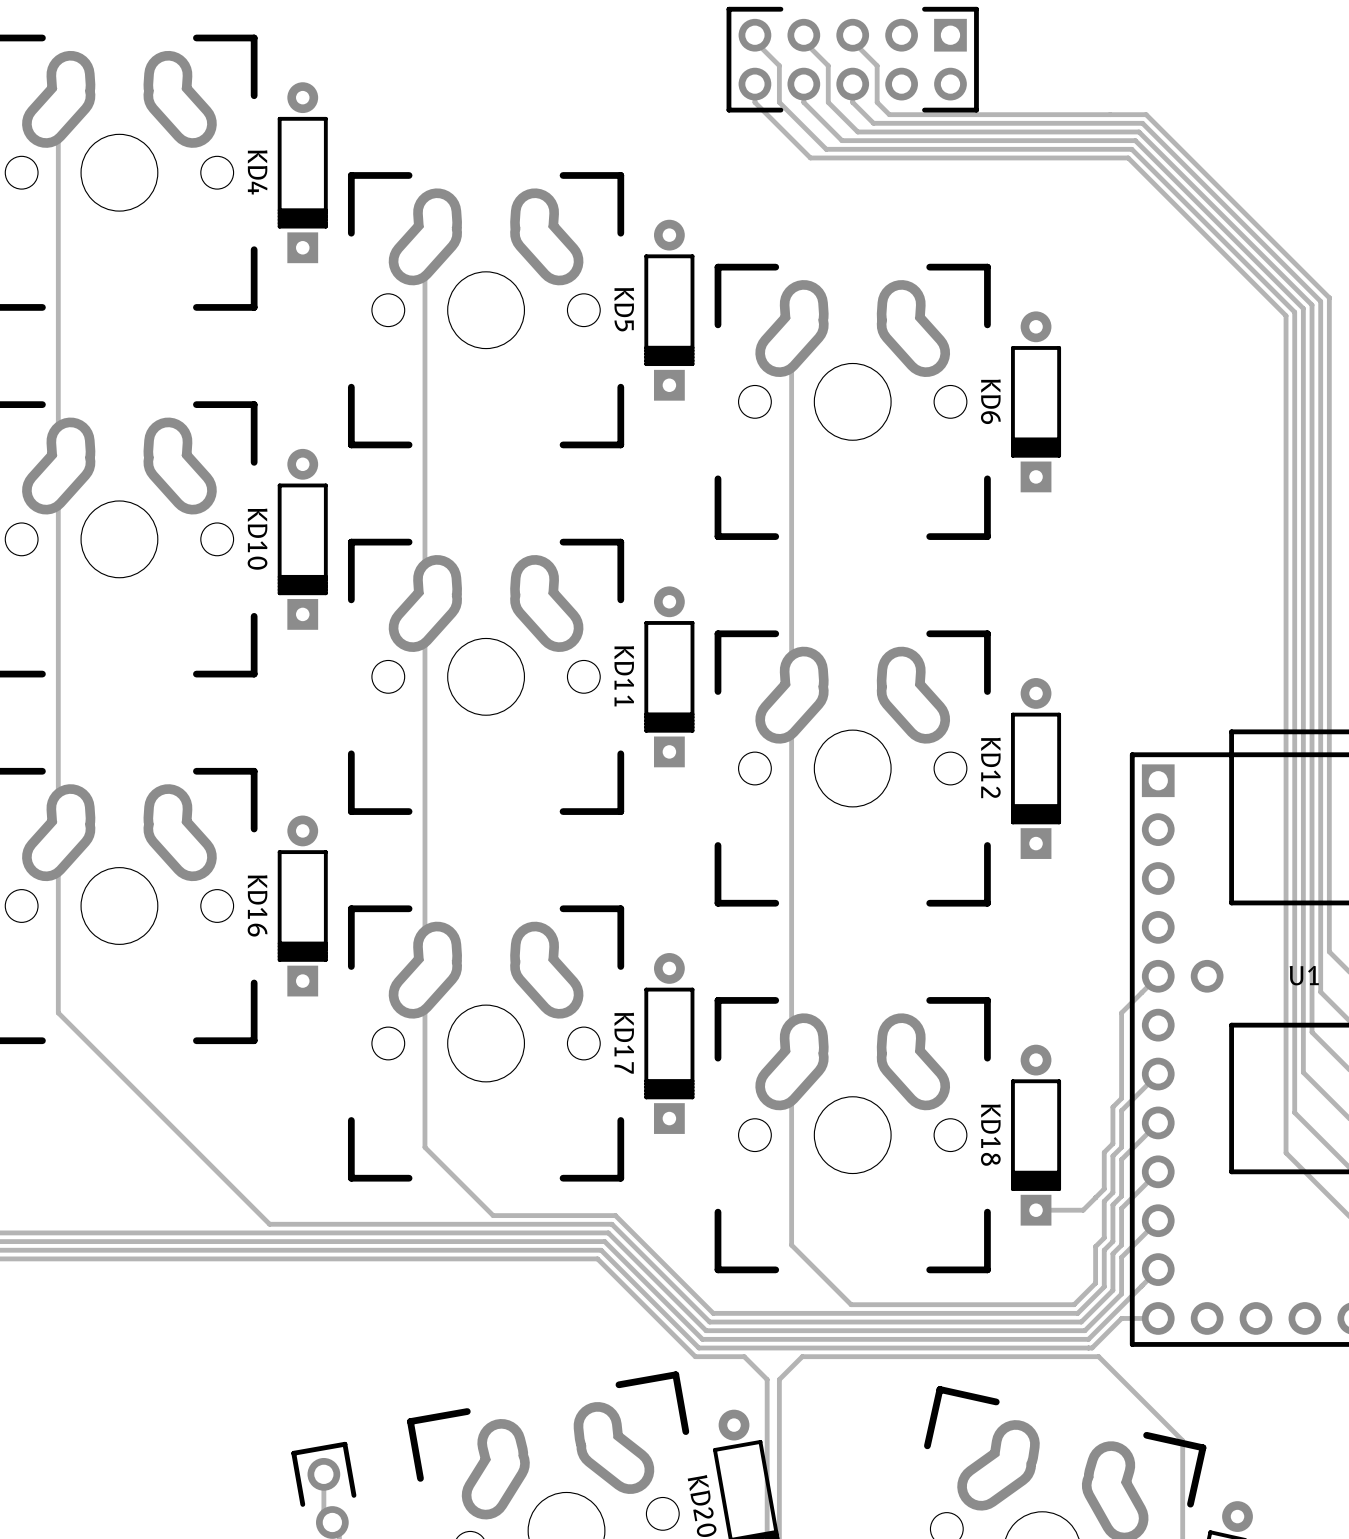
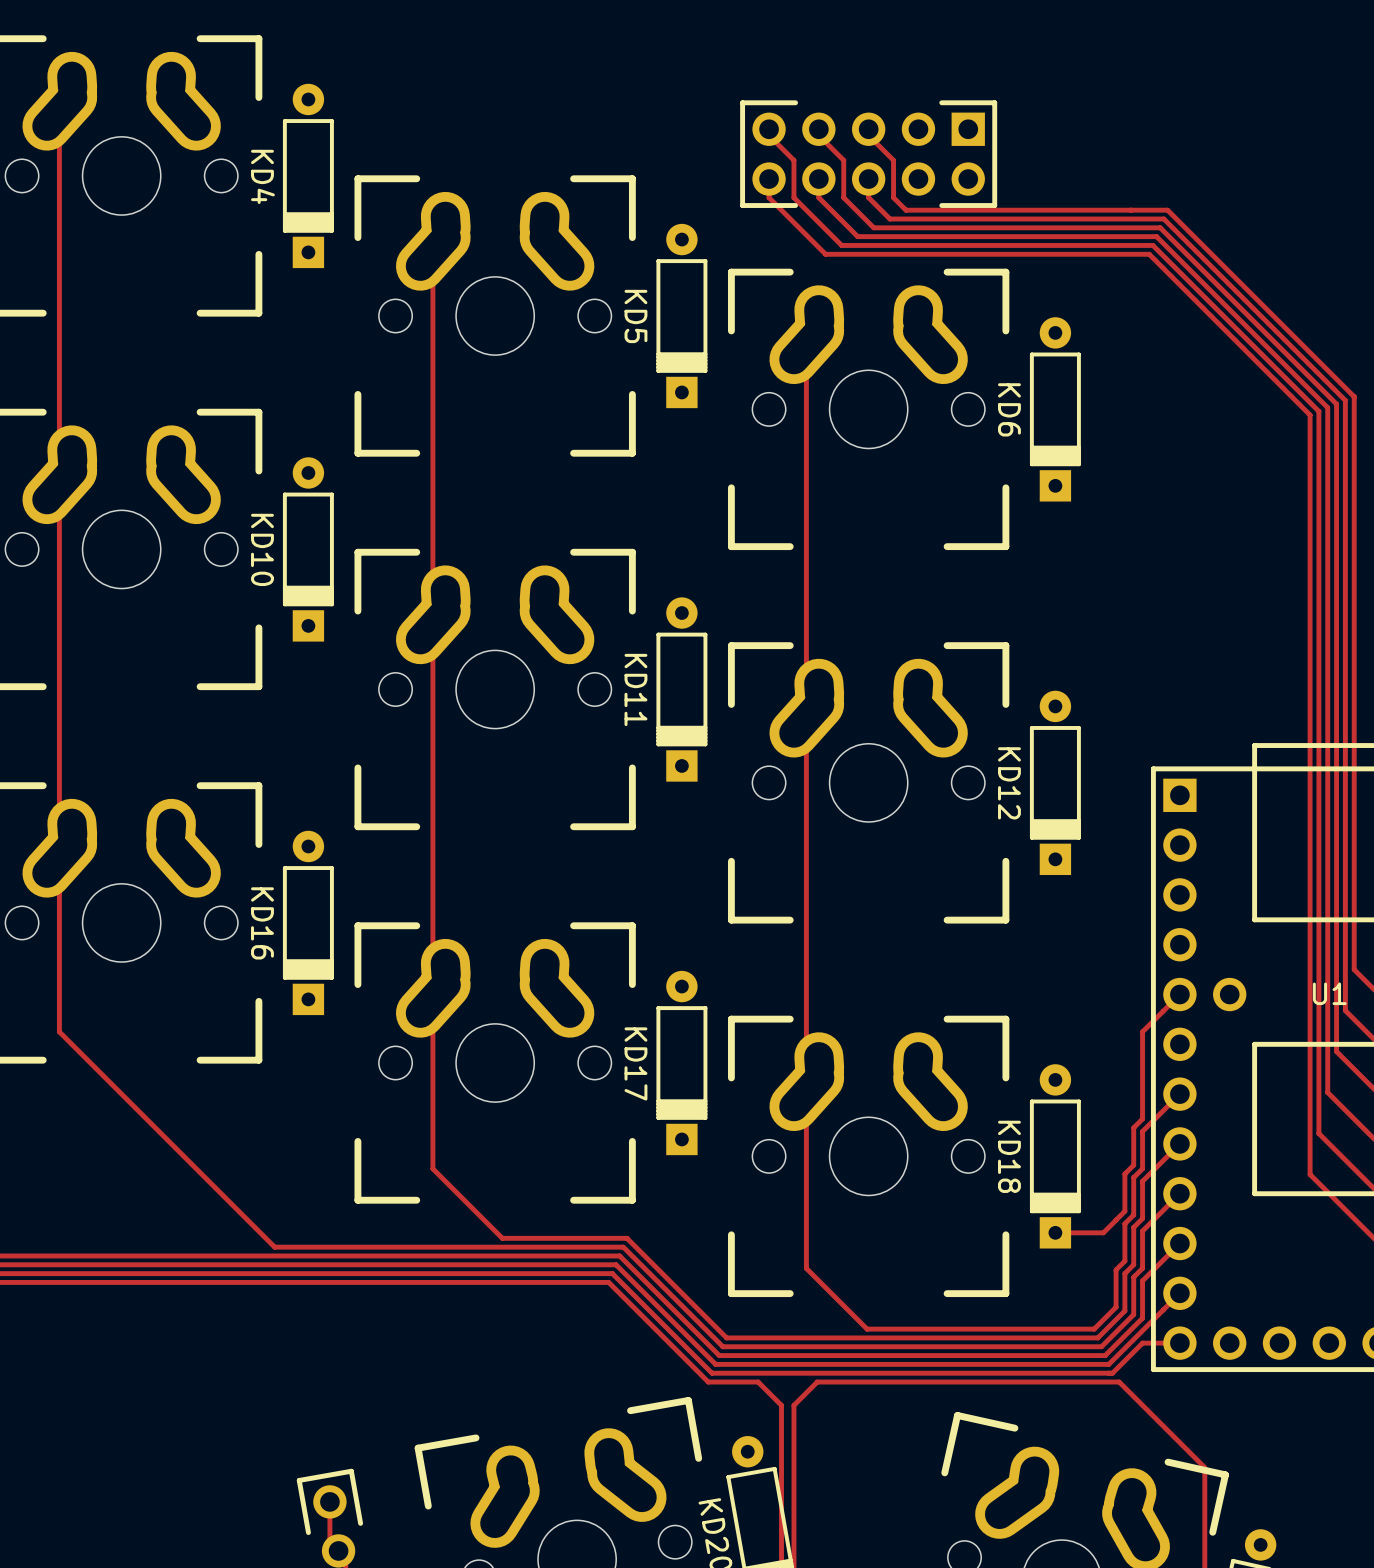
track: (754, 41) (779, 65) (779, 102) (826, 149) (1131, 149) (1294, 312) (1294, 403) -> (769, 135) (793, 160) (793, 197) (841, 245) (1152, 245) (1318, 411)
track: (803, 41) (828, 65) (828, 102) (857, 131) (1138, 131) (1312, 305) (1312, 396) -> (818, 135) (843, 160) (843, 197) (873, 227) (1160, 227) (1336, 404)
track: (852, 41) (877, 65) (877, 102) (889, 114) (1146, 114) (1329, 297) (1329, 389) -> (868, 135) (893, 160) (893, 197) (906, 210) (1167, 210) (1354, 396)
part position: (852, 59) -> (868, 154)
track: (754, 90) (754, 102) (810, 157) (1128, 157) (1286, 315) (1286, 407) -> (769, 185) (769, 197) (825, 254) (1149, 254) (1310, 415)
track: (803, 90) (803, 102) (842, 140) (1135, 140) (1303, 308) (1303, 400) -> (818, 185) (818, 197) (857, 236) (1156, 236) (1327, 407)
track: (852, 90) (852, 102) (873, 123) (1142, 123) (1320, 301) (1320, 393) -> (868, 185) (868, 197) (889, 219) (1163, 219) (1345, 400)

